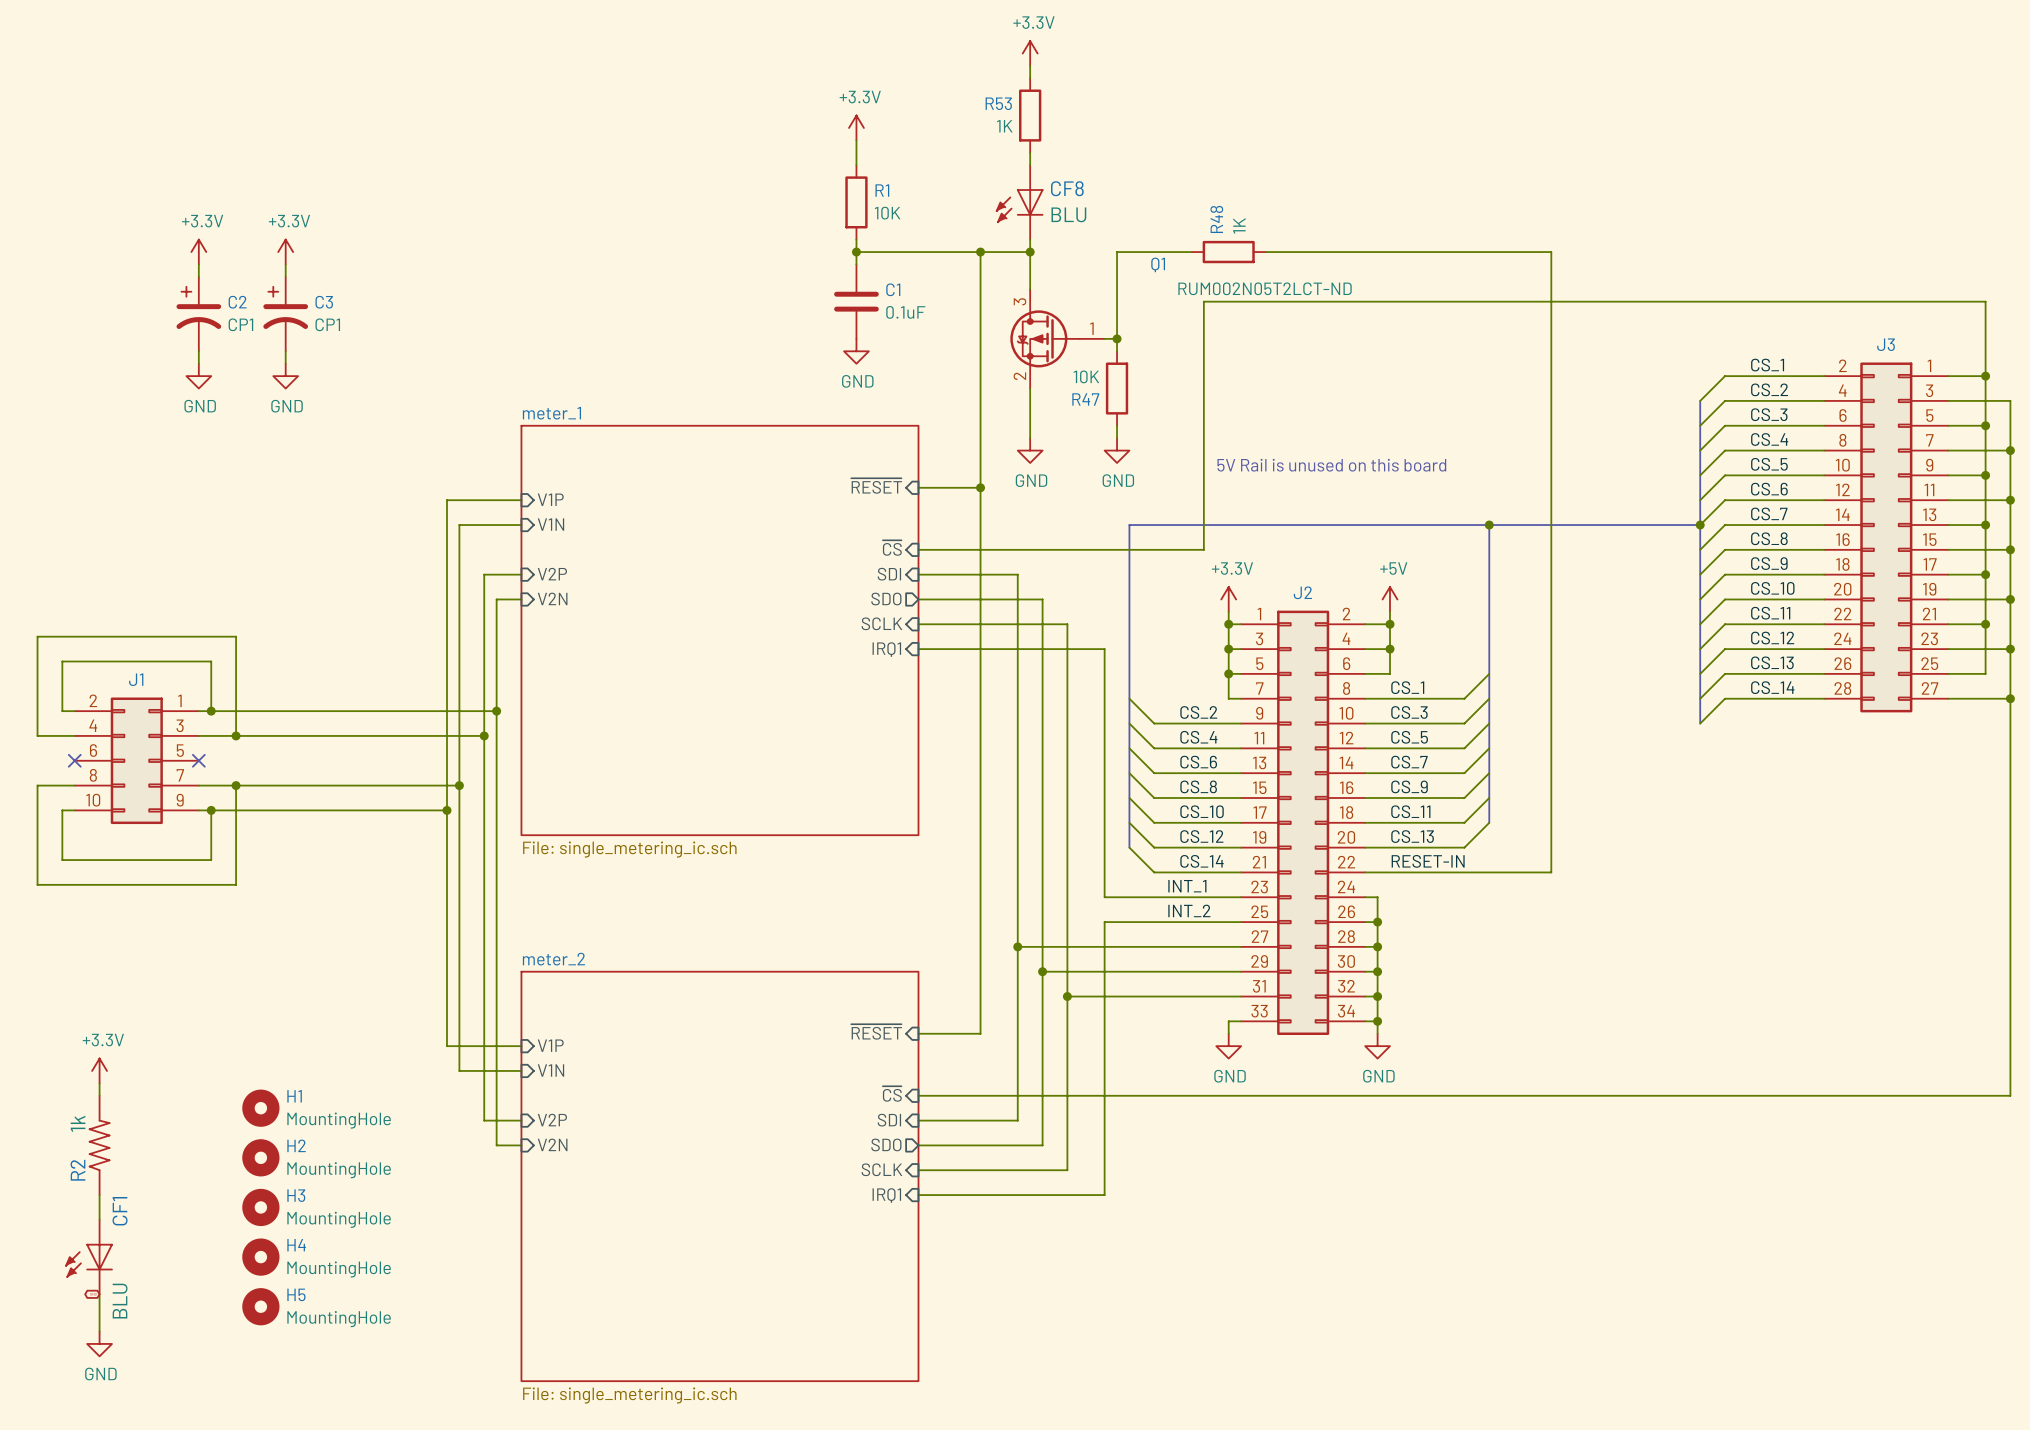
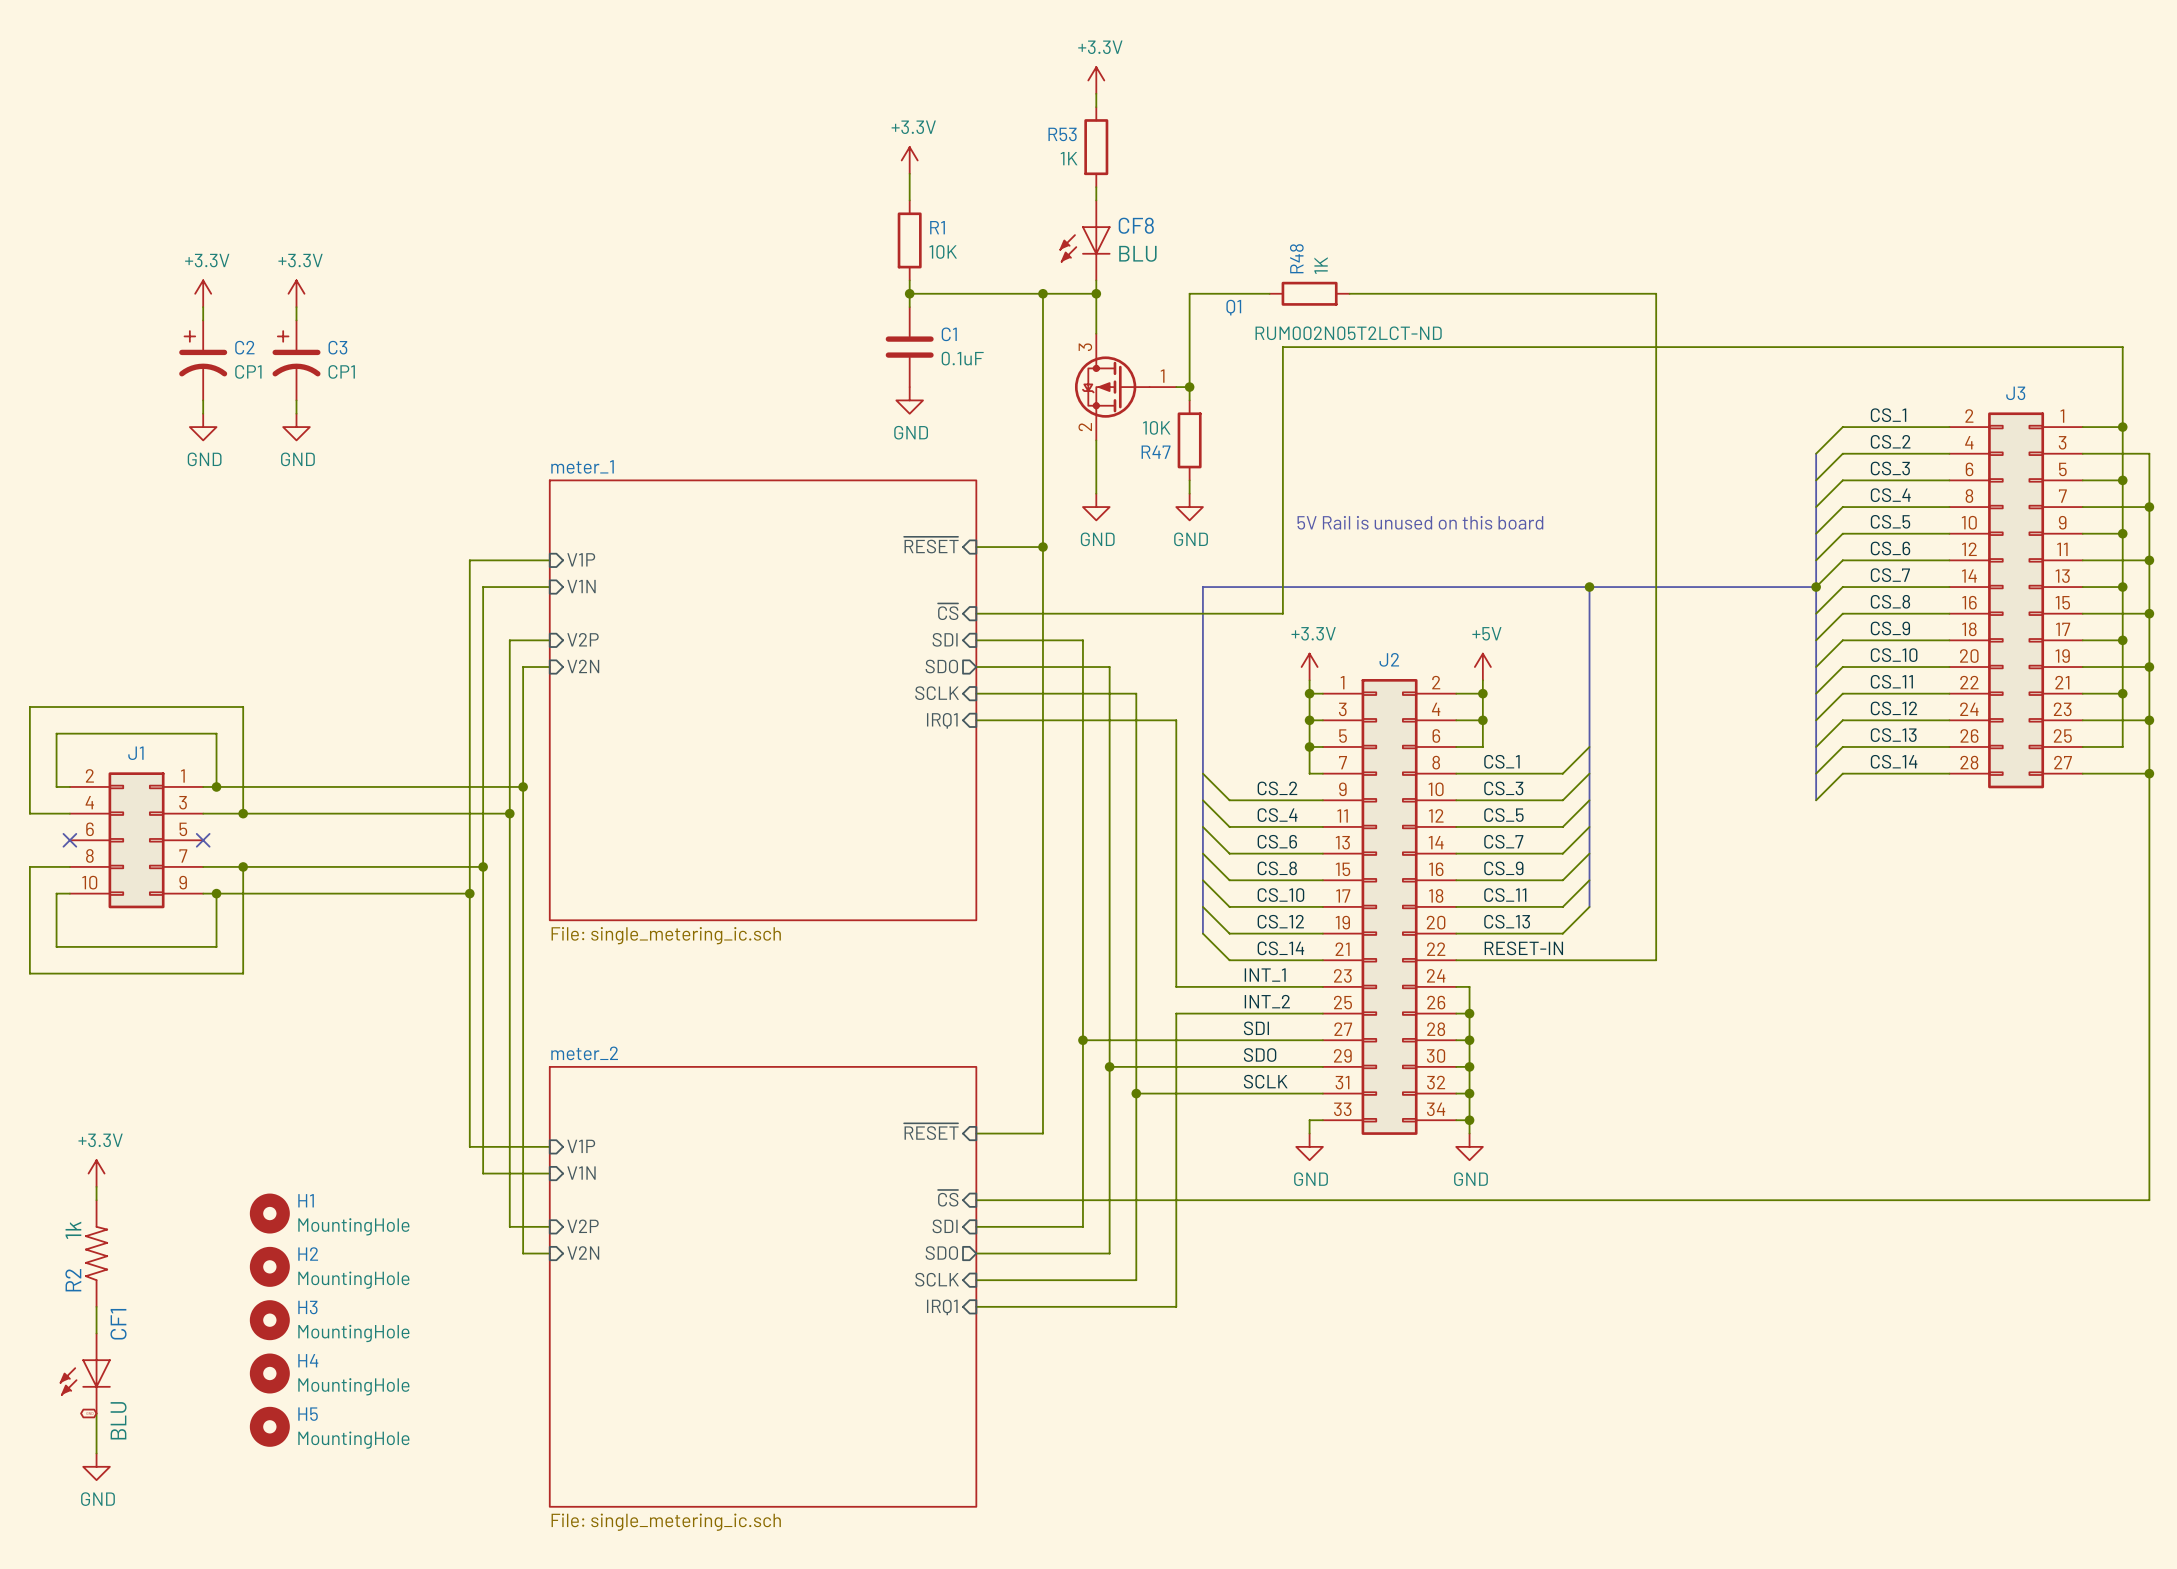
label: none -> SDI (1256, 1028)
label: none -> SDO (1260, 1055)
label: none -> SCLK (1265, 1081)

